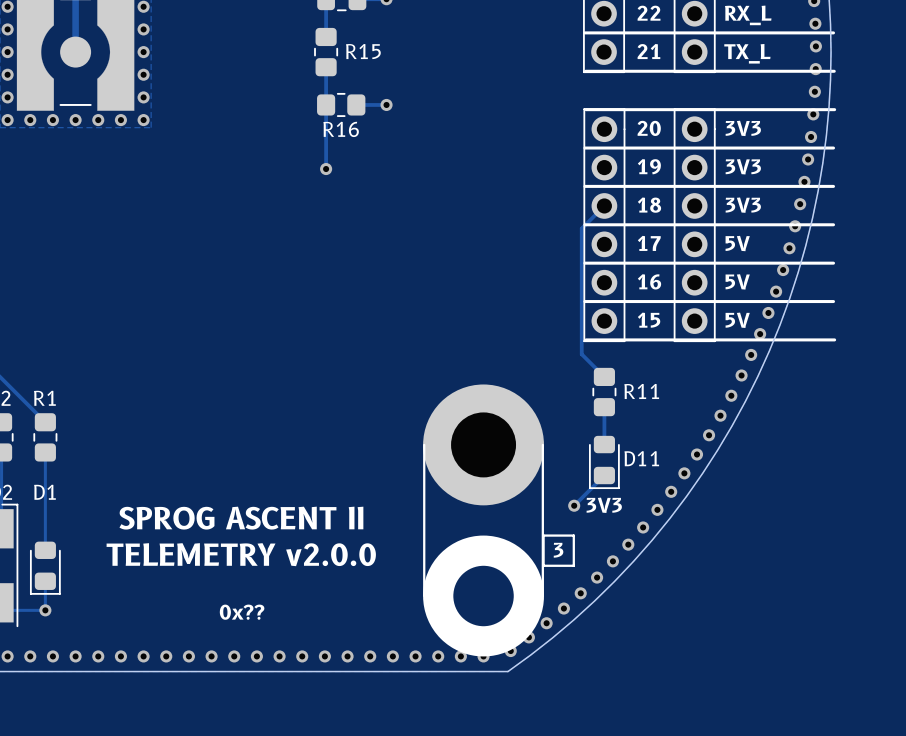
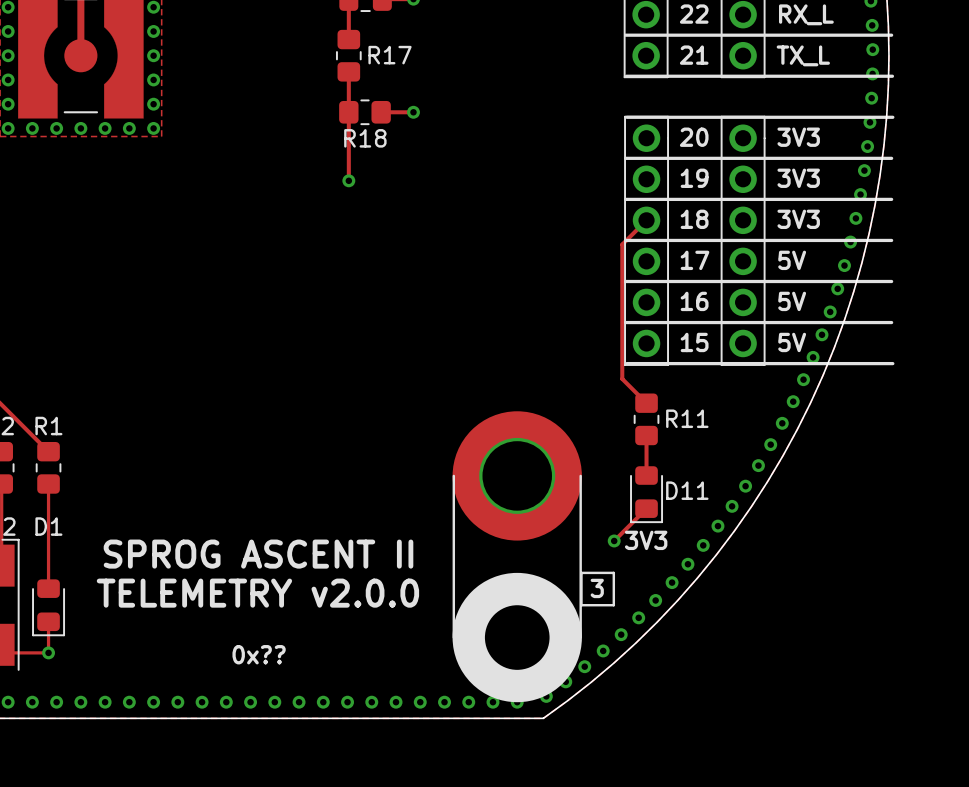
R15 name: R15 (363, 51) -> R17 (390, 55)
R16 name: R16 (341, 129) -> R18 (365, 138)

